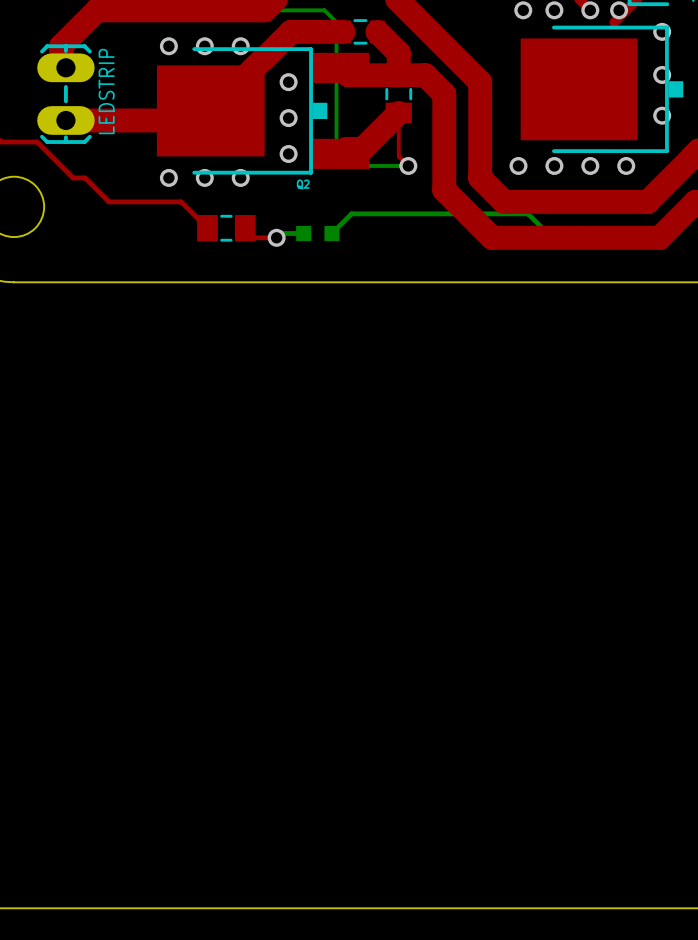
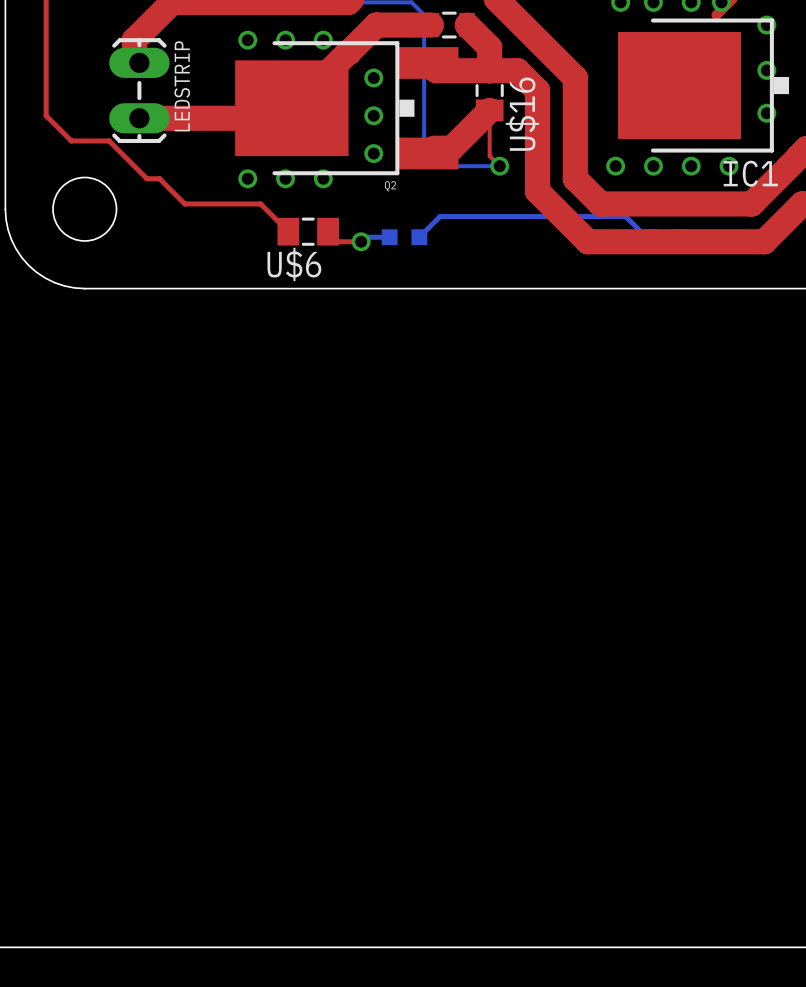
U$16 name: none -> U$16 (522, 114)
IC1 name: none -> IC1 (750, 173)
U$6 name: none -> U$6 (294, 264)

